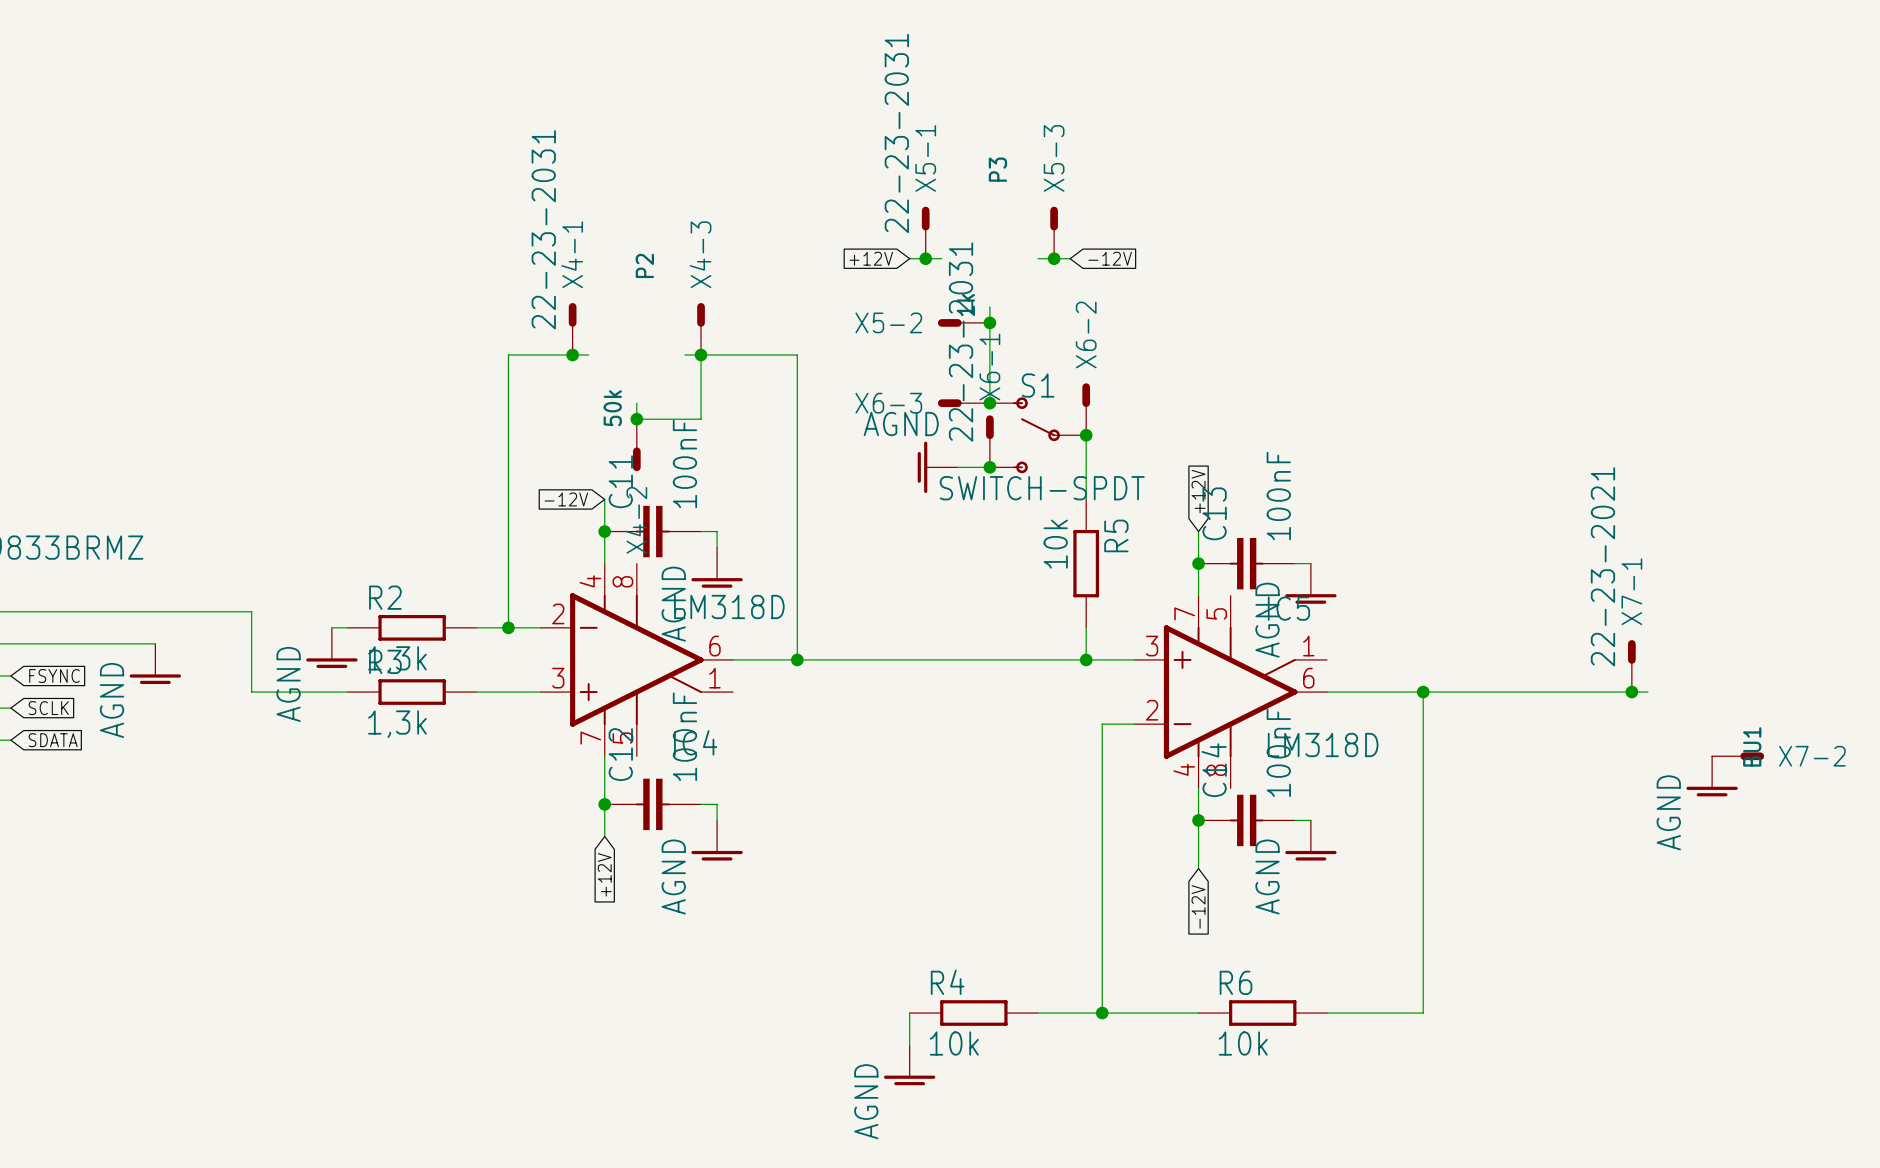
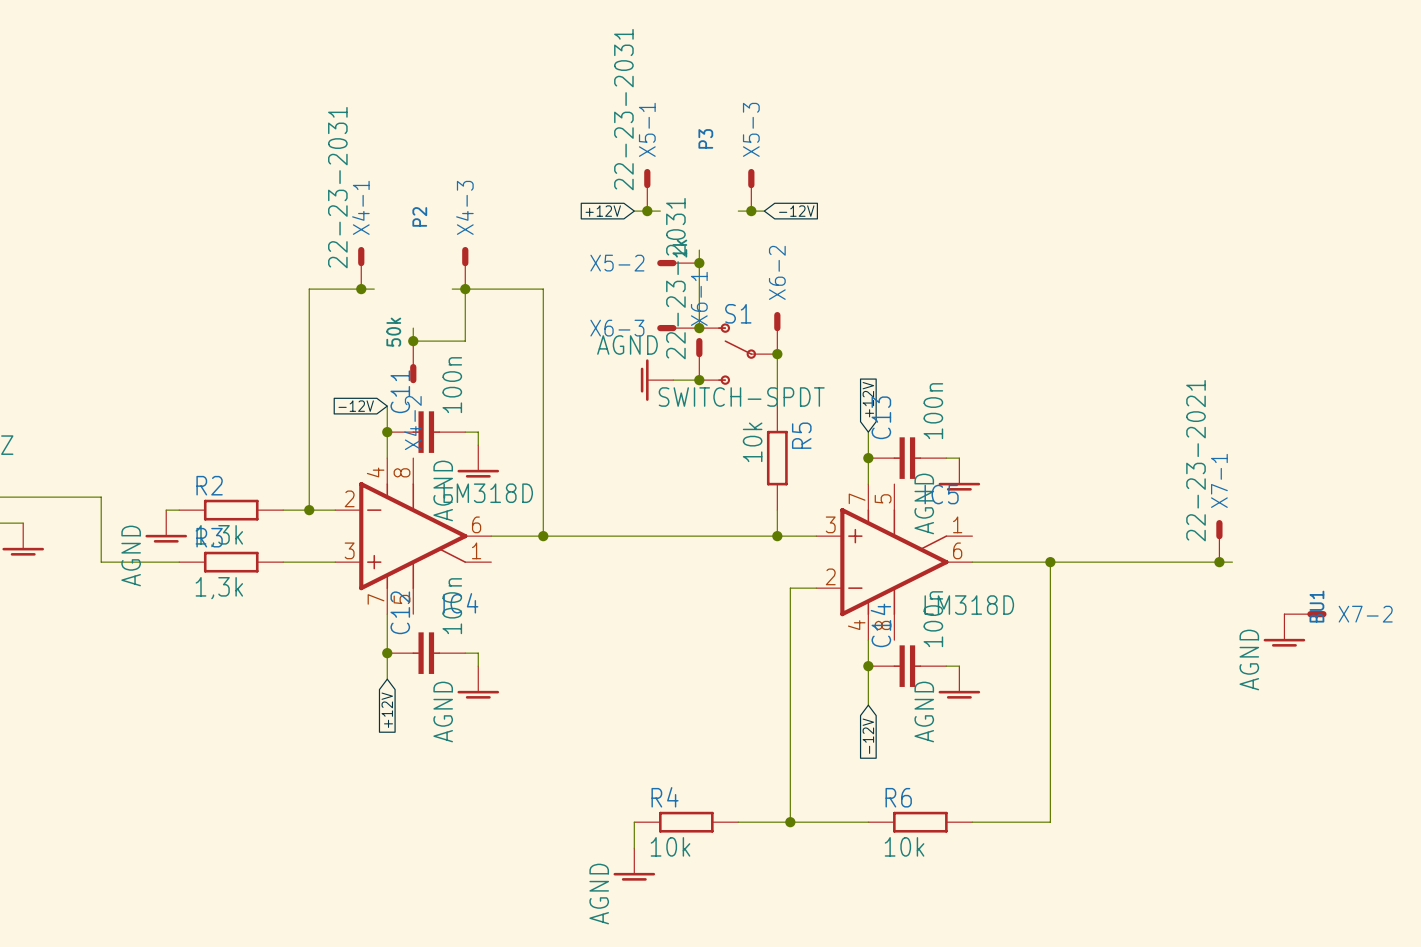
C11 value: 100nF (684, 463) -> 100n (452, 385)
C13 value: 100nF (1278, 496) -> 100n (933, 411)
C12 value: 100nF (684, 736) -> 100n (452, 606)
C14 value: 100nF (1278, 752) -> 100n (933, 619)

